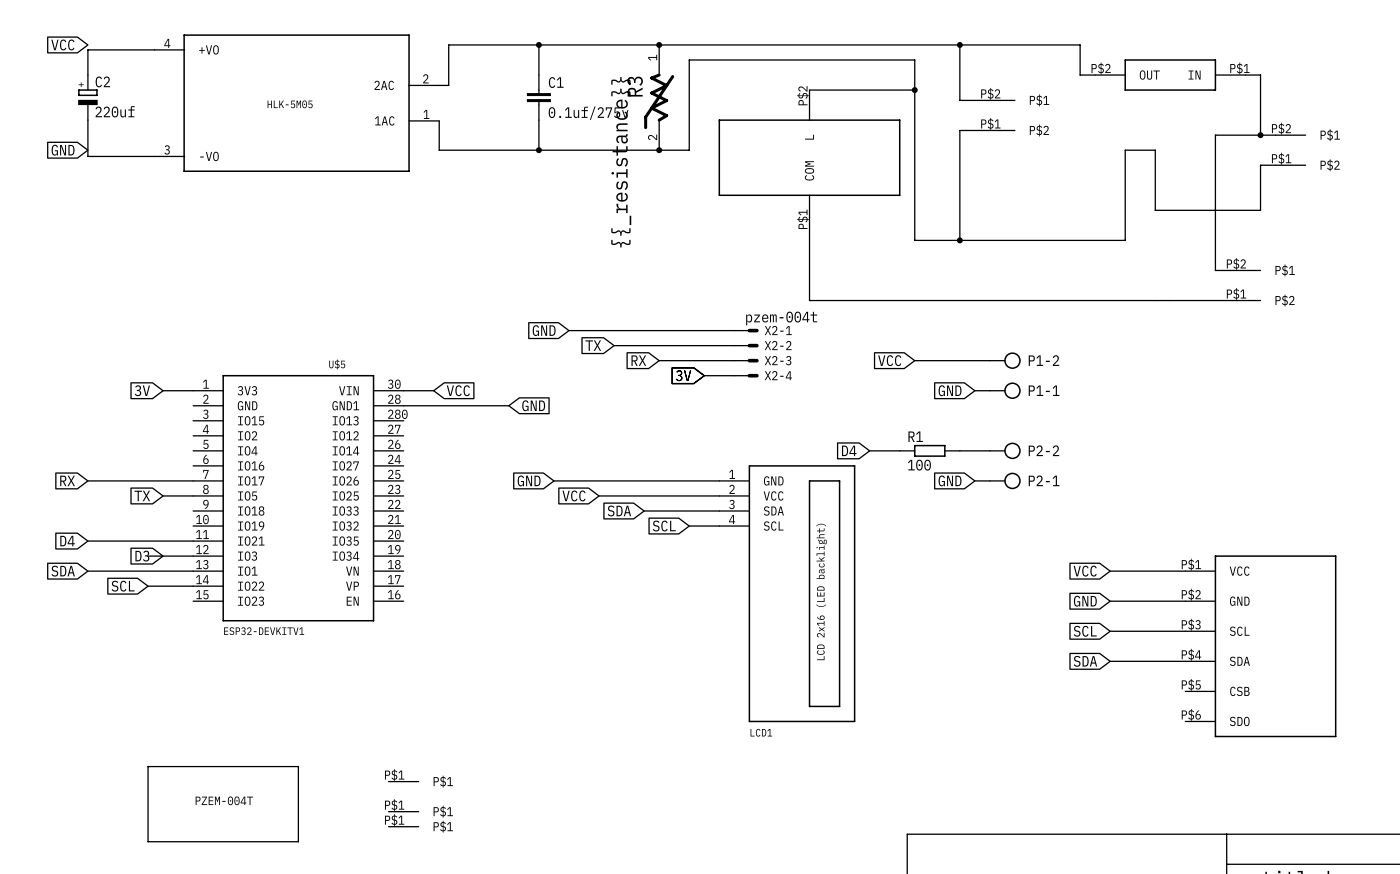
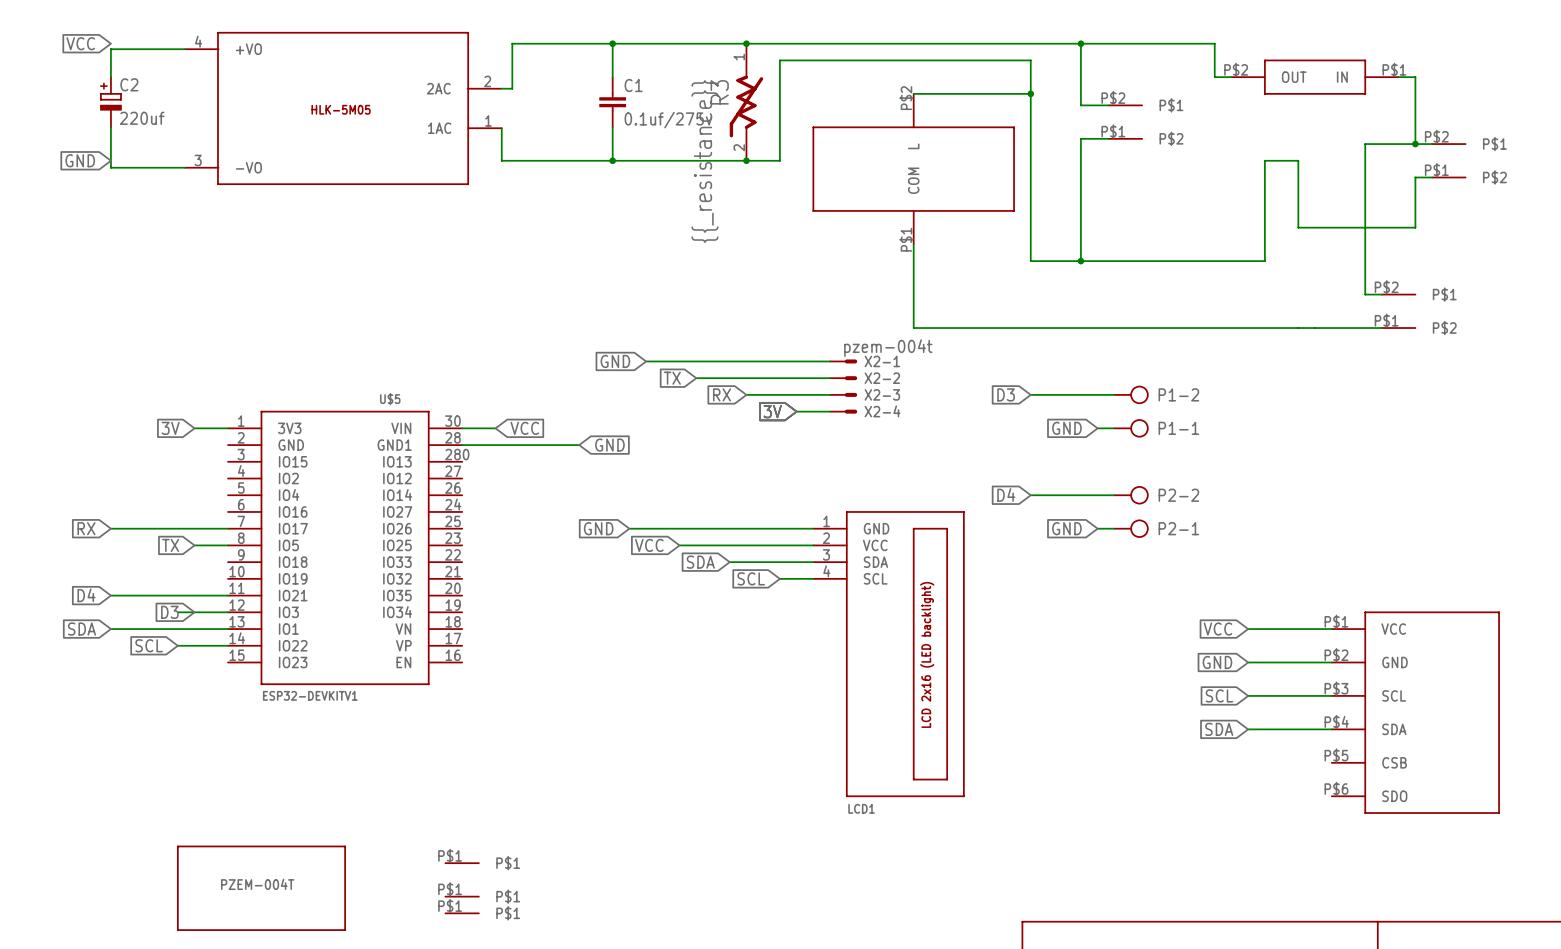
global label: VCC (889, 360) -> D3 (1006, 394)
global label position: D4 (849, 450) -> D4 (1006, 494)
wire: (869, 450) (899, 450) -> none
wire: none -> (1030, 495) (1080, 495)
R1: 100 (929, 450) -> none

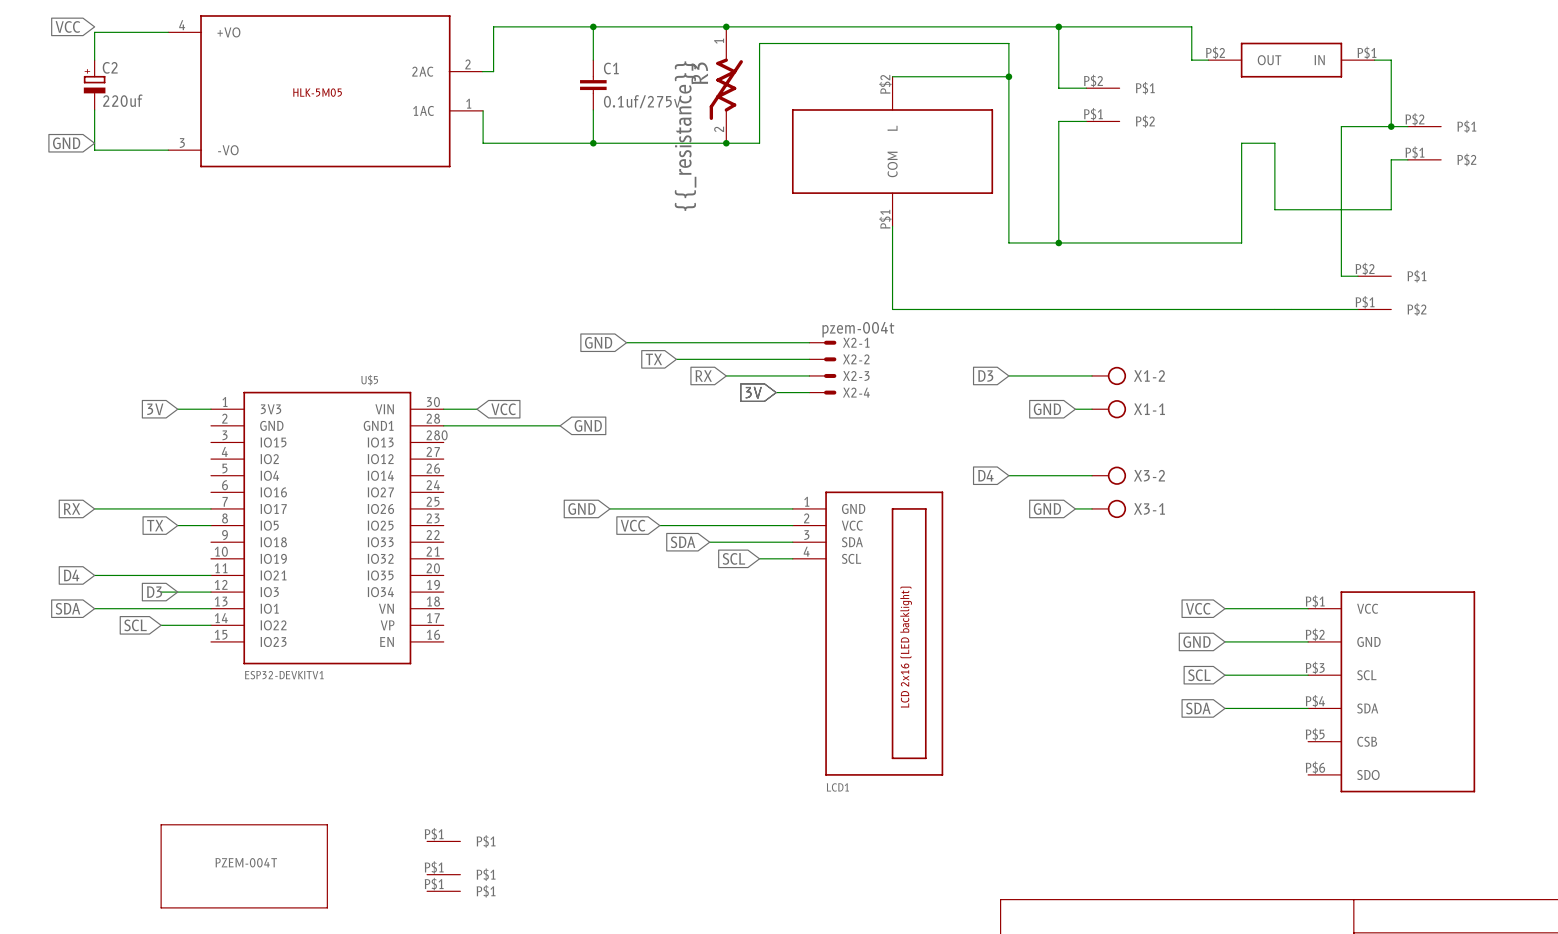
P1-2 name: P1-2 (1178, 394) -> X1-2 (1149, 375)
P1-1 name: P1-1 (1178, 428) -> X1-1 (1149, 409)
P2-2 name: P2-2 (1178, 495) -> X3-2 (1149, 475)
P2-1 name: P2-1 (1178, 528) -> X3-1 (1149, 508)

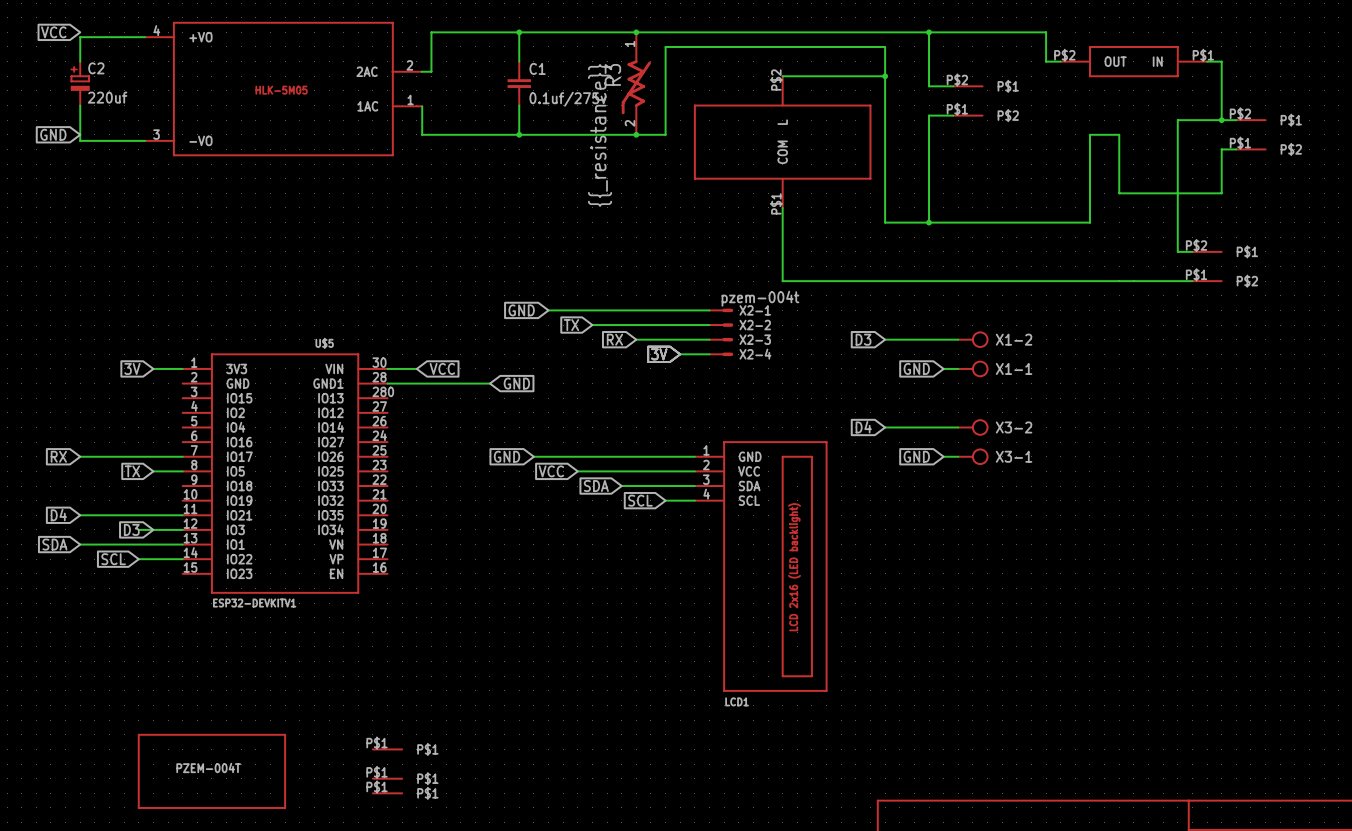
global label: VCC (1198, 608) -> none
wire: (1225, 608) (1308, 608) -> none
wire: (1225, 641) (1308, 641) -> none
global label: GND (1197, 642) -> none
global label: SCL (1199, 675) -> none
wire: (1225, 675) (1308, 675) -> none
part: (1391, 691) -> none
global label: SDA (1198, 708) -> none
wire: (1225, 708) (1308, 708) -> none

